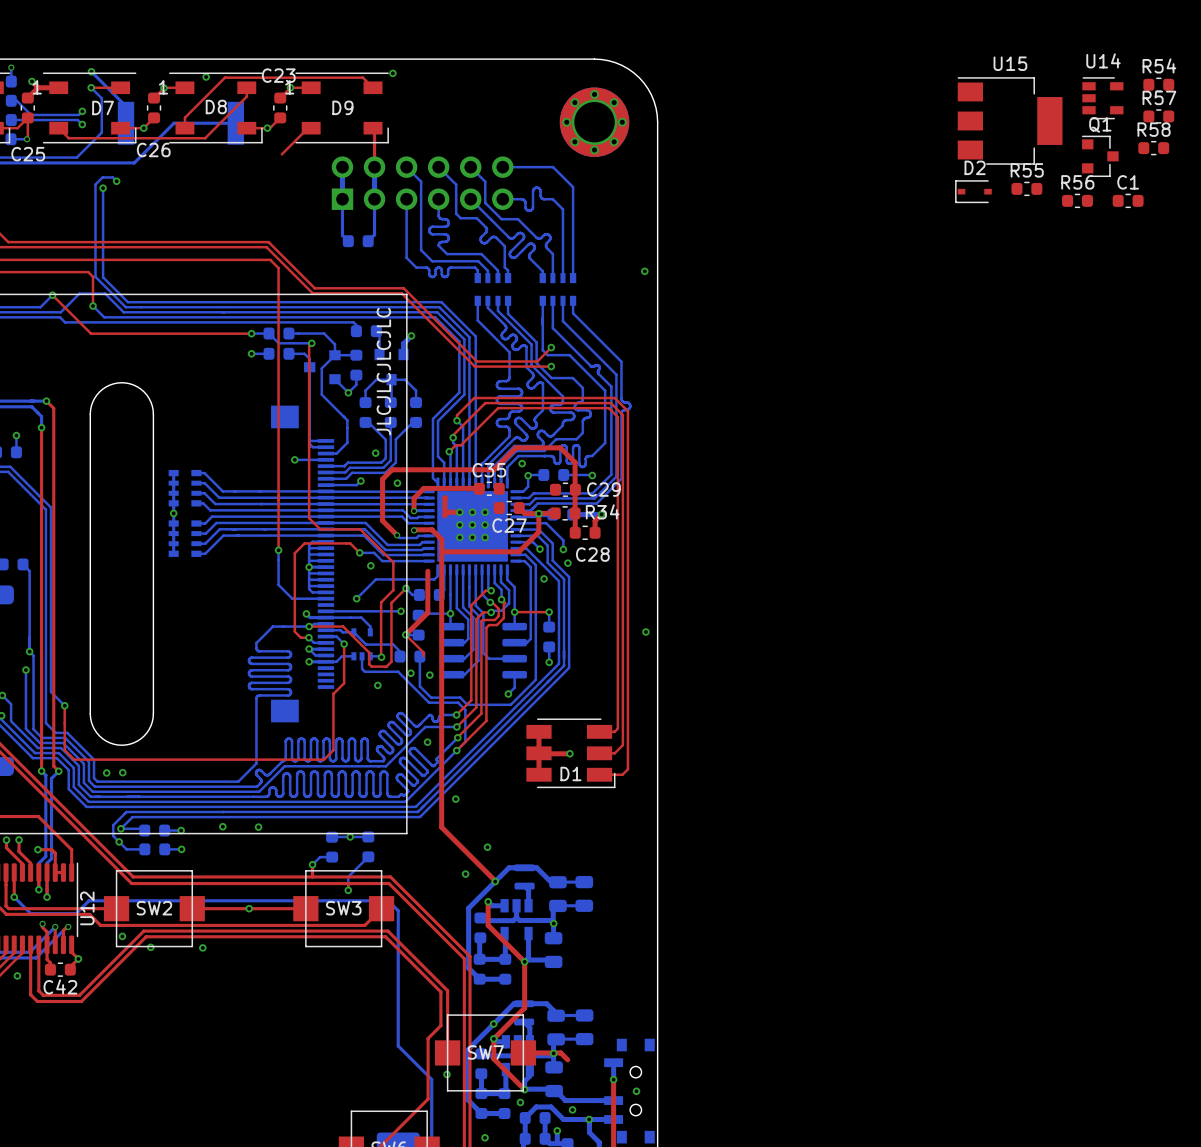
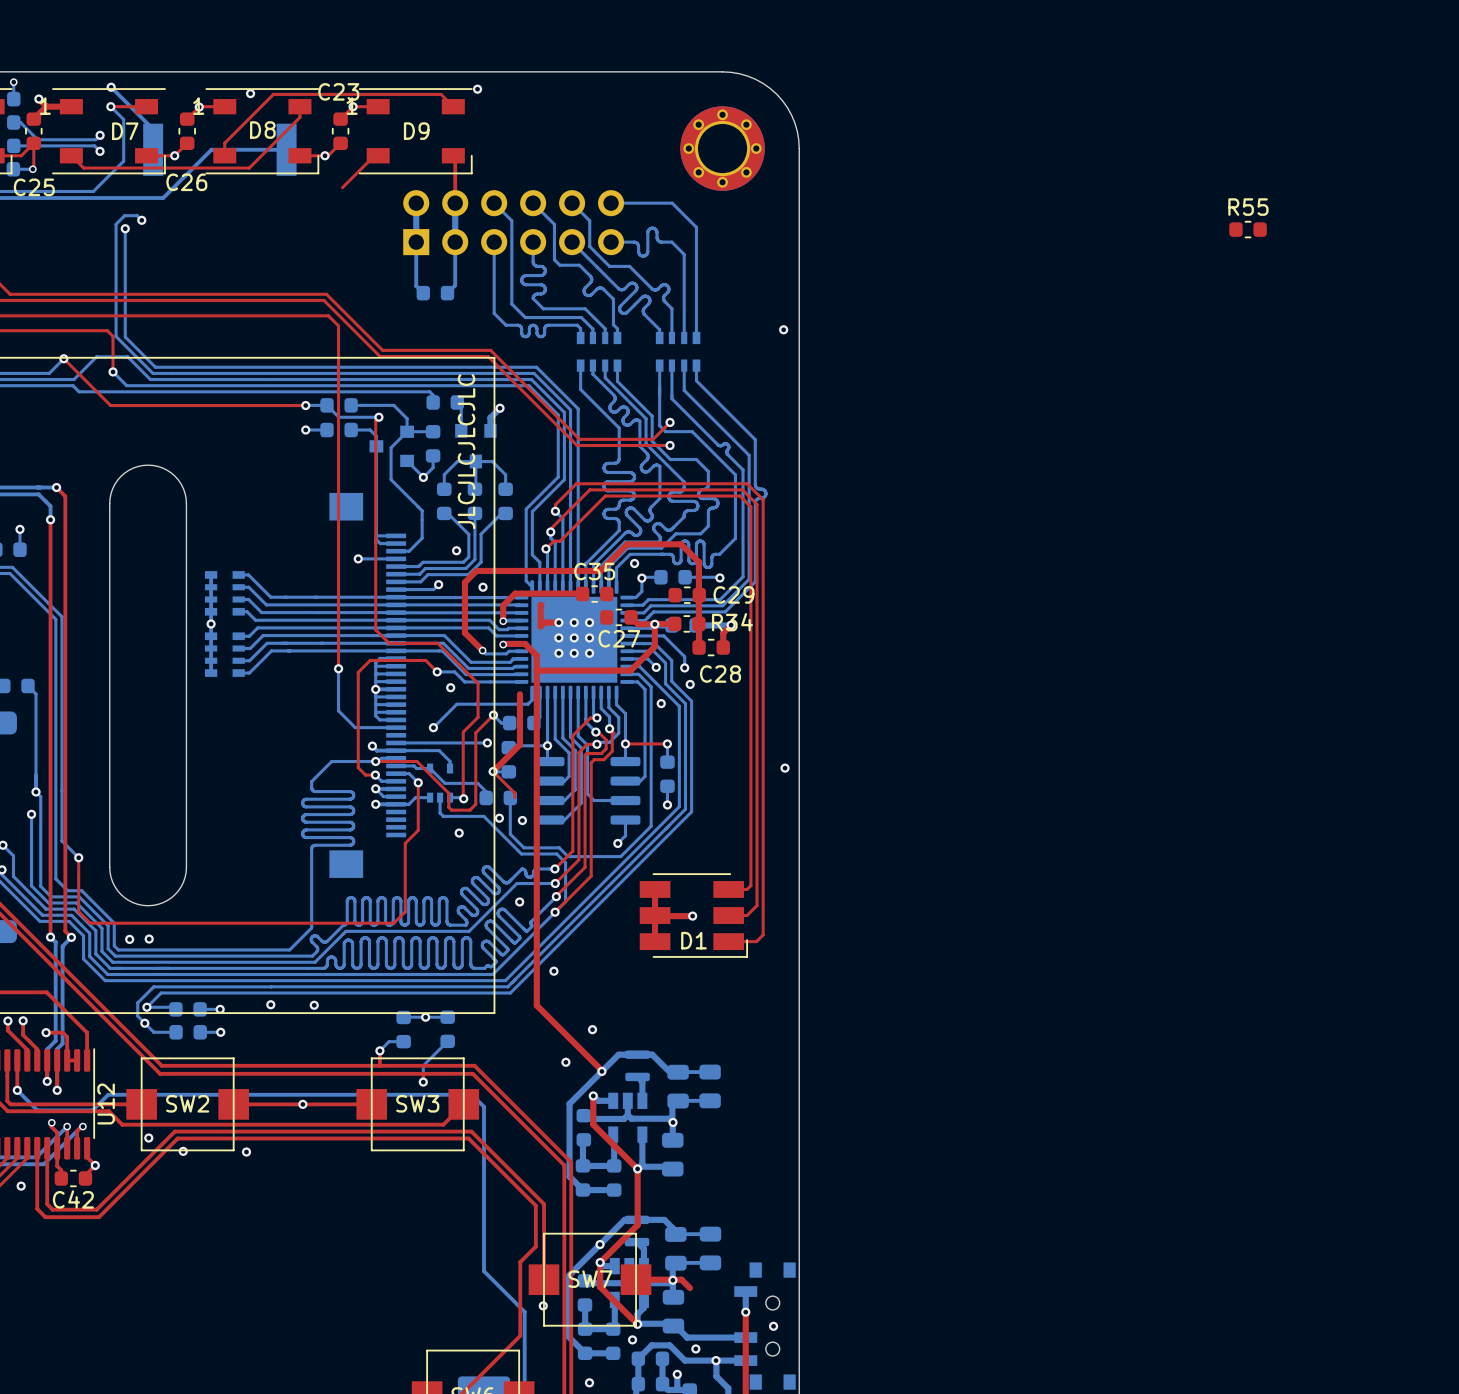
R54: (1158, 84) -> none
U14: (1102, 98) -> none
R57: (1158, 116) -> none
U15: (1010, 120) -> none
R58: (1153, 148) -> none
Q1: (1100, 156) -> none
D2: (973, 191) -> none
R56: (1077, 200) -> none
C1: (1128, 200) -> none

